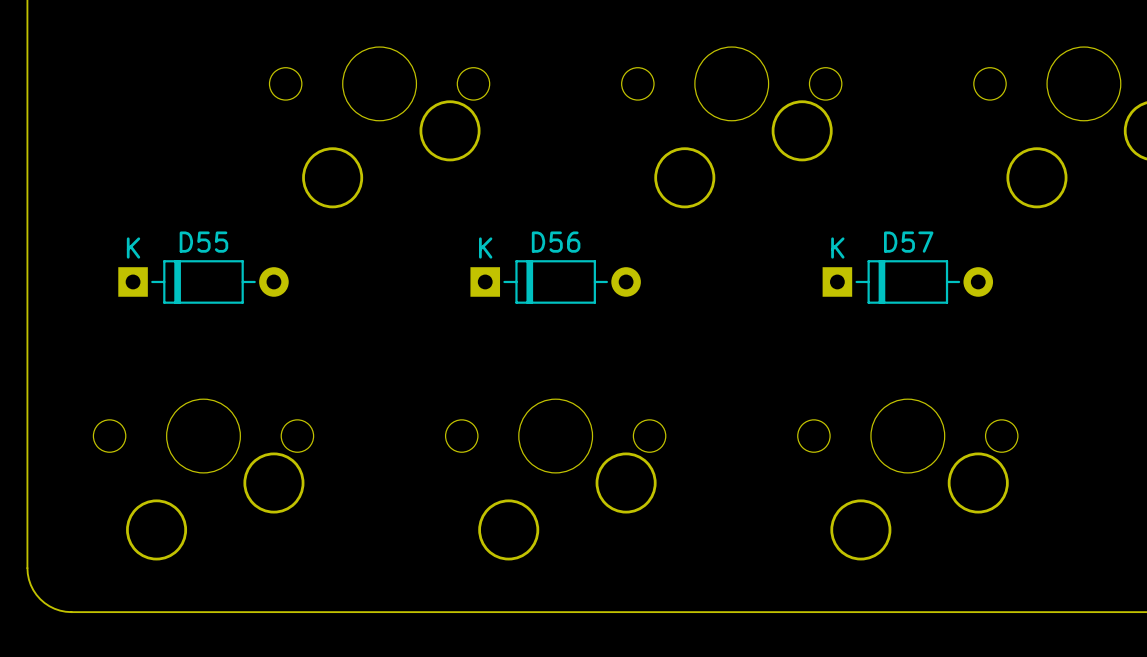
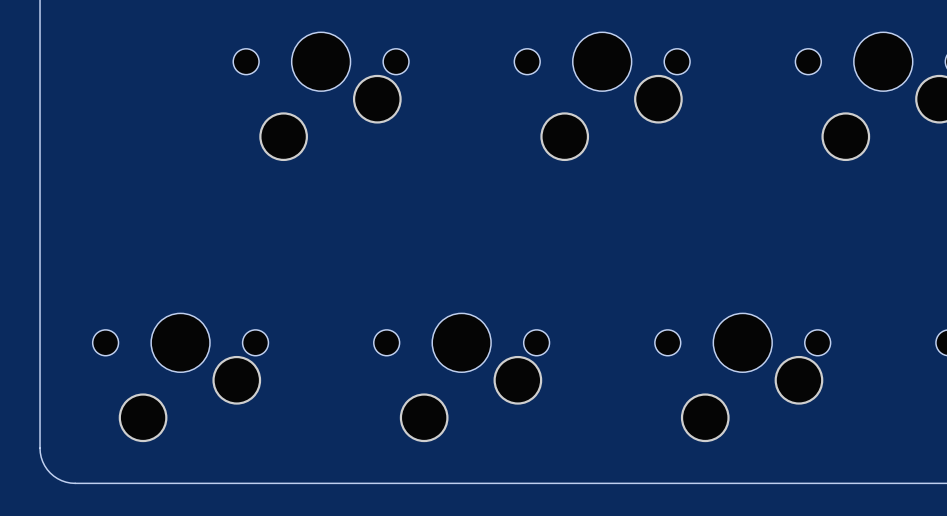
D55: (203, 281) -> none
D56: (555, 281) -> none
D57: (907, 281) -> none

